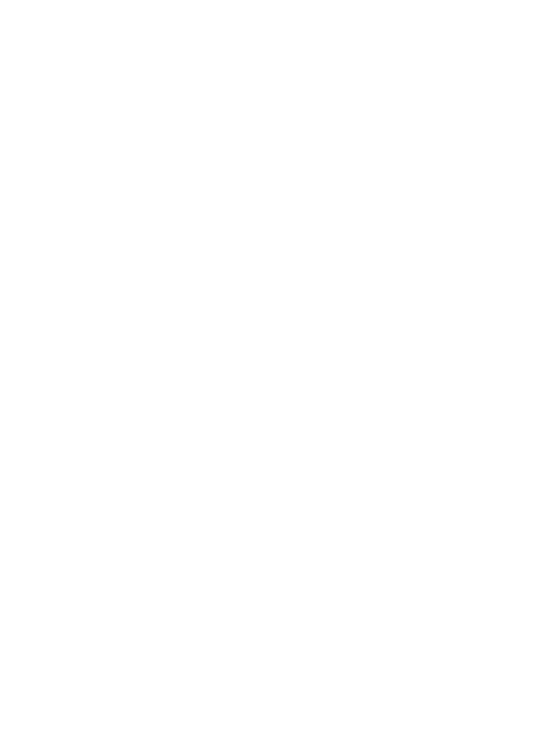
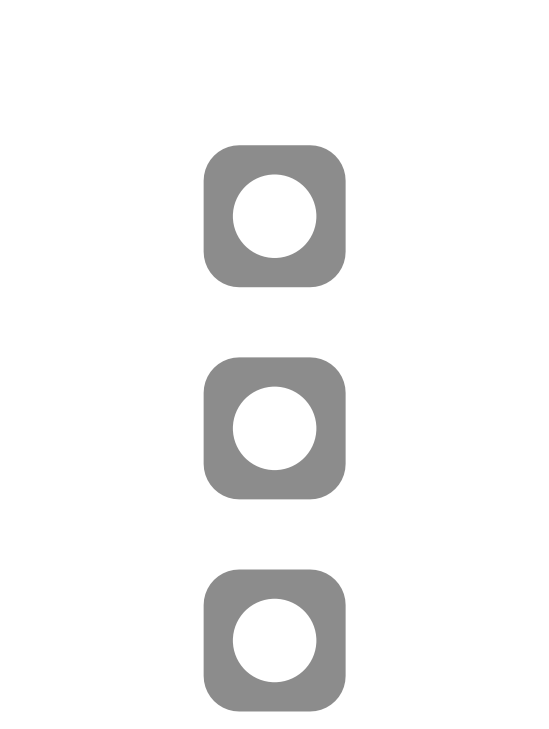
part: none -> (274, 428)

